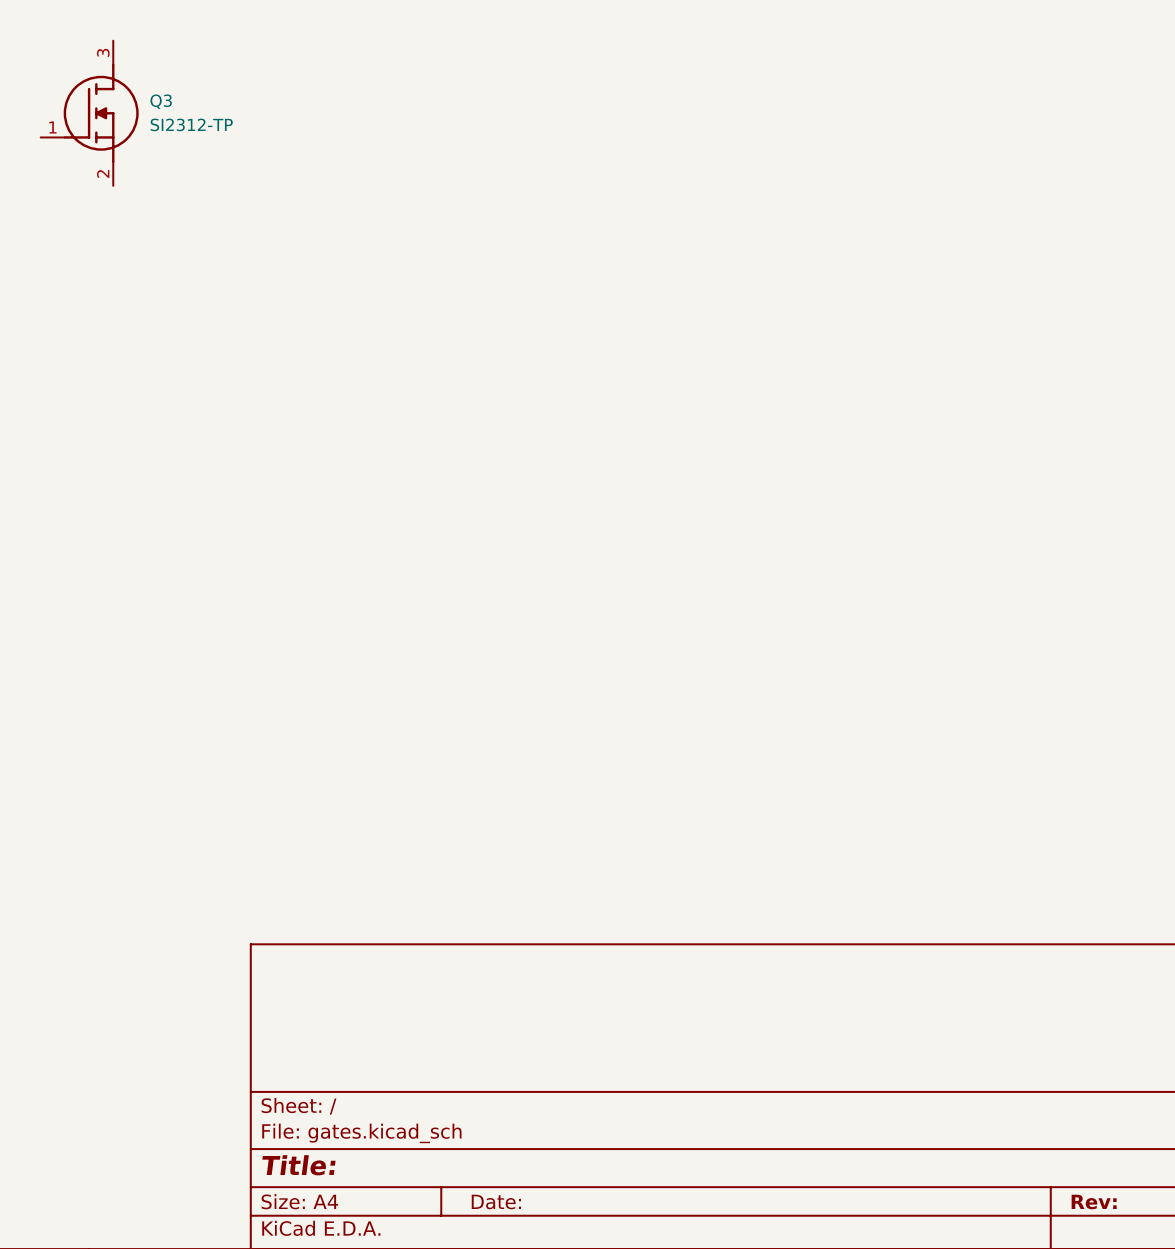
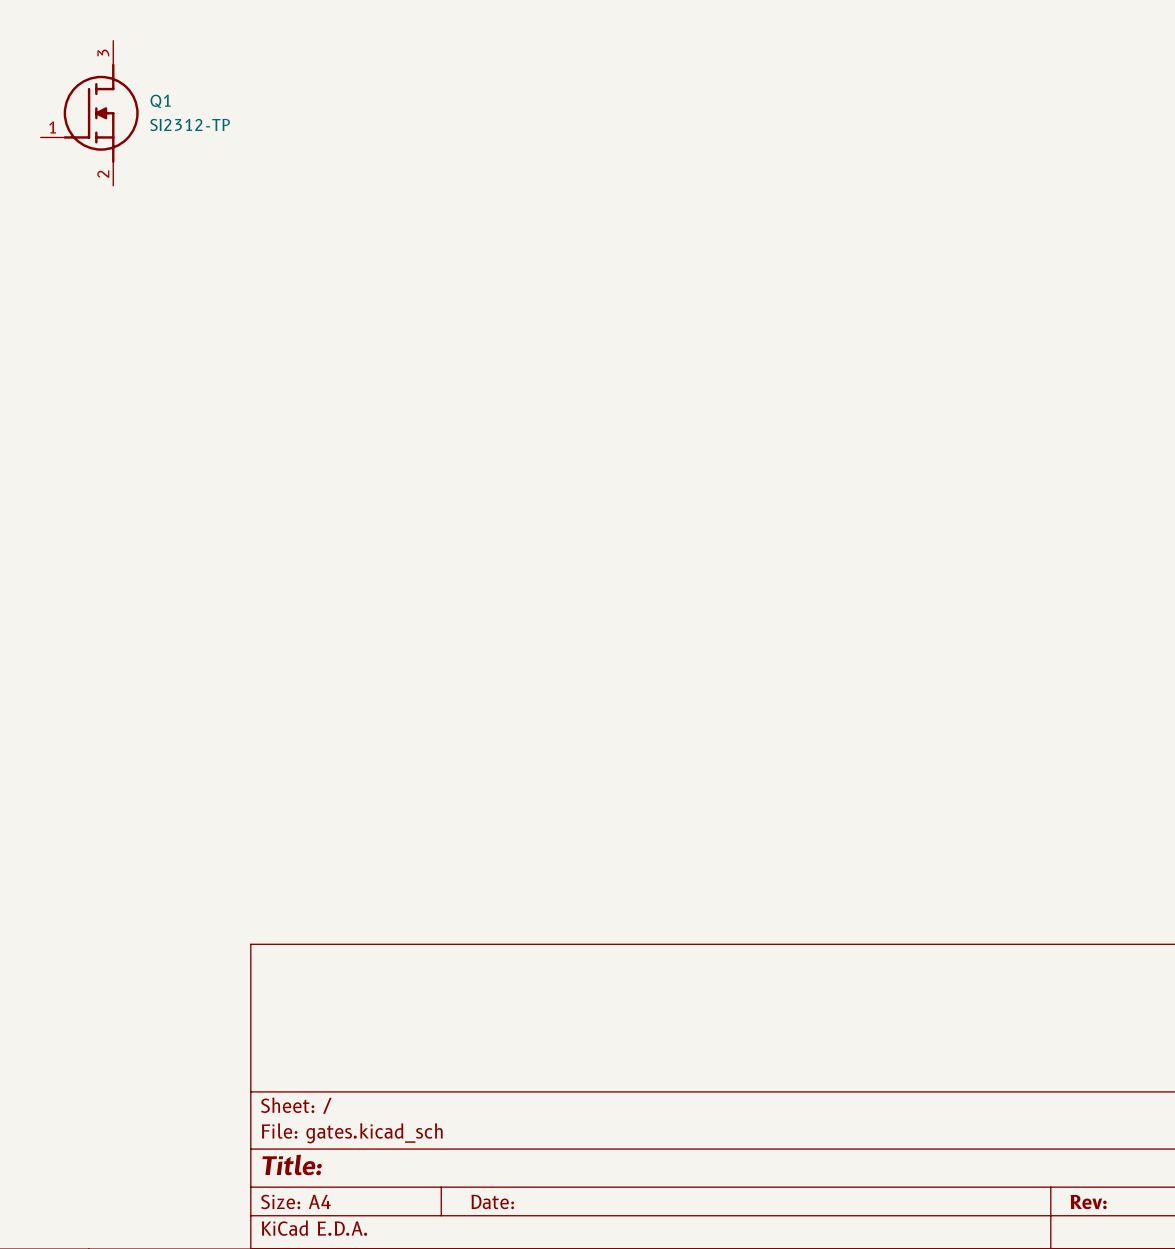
Q3 name: Q3 (161, 101) -> Q1 (160, 101)

